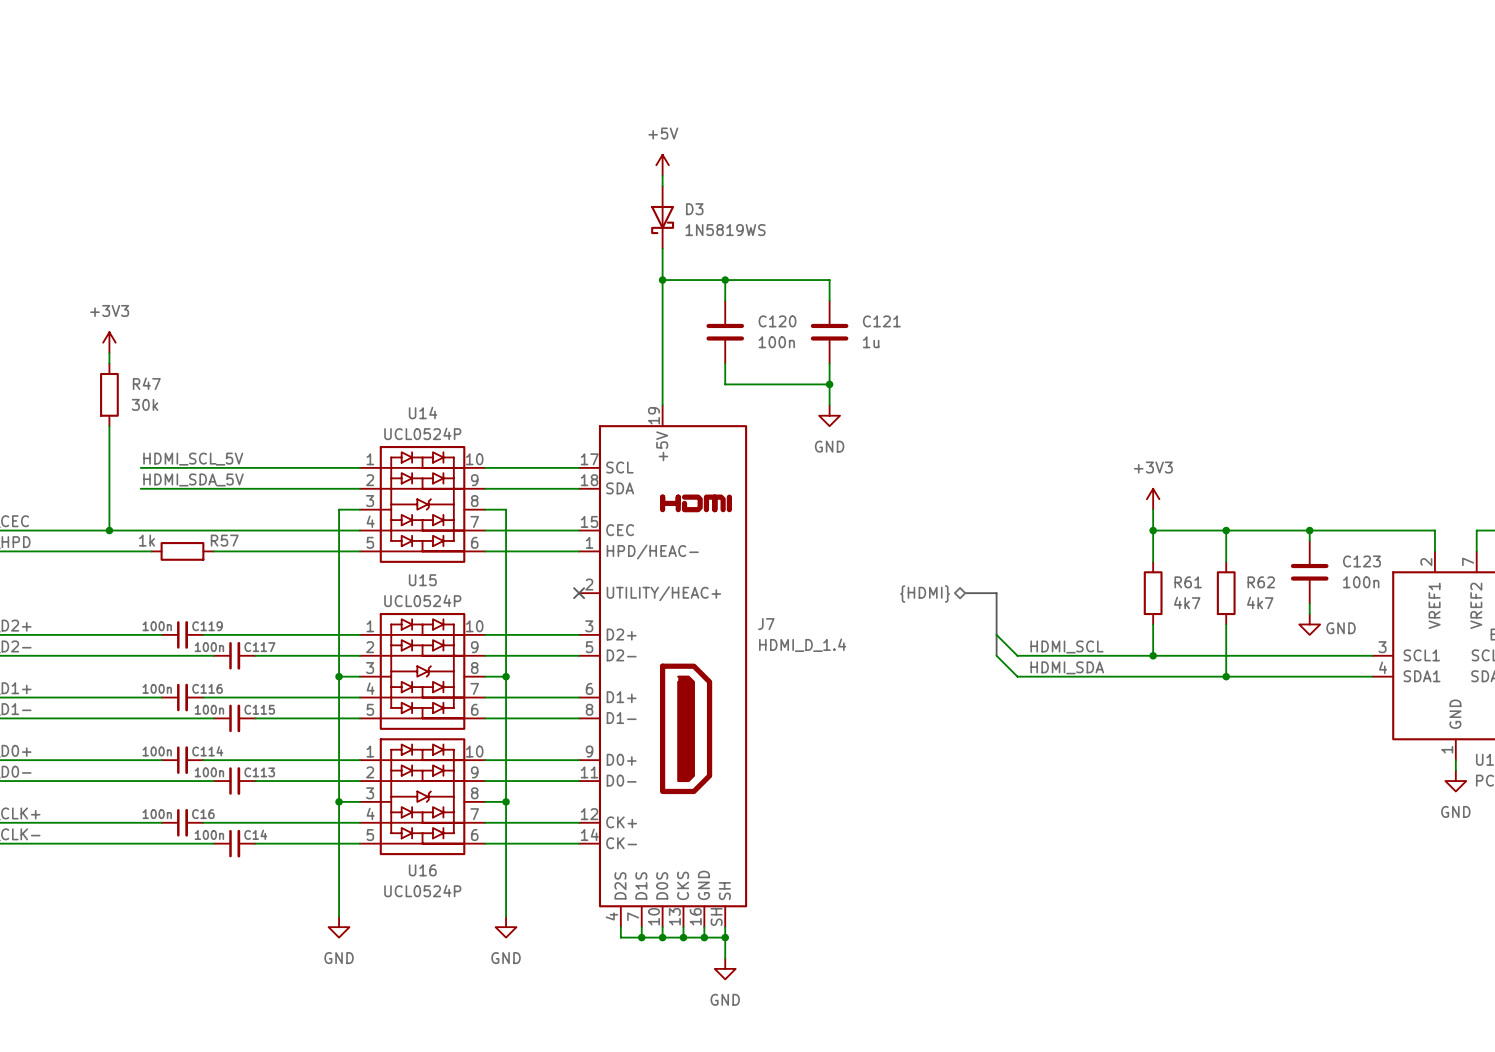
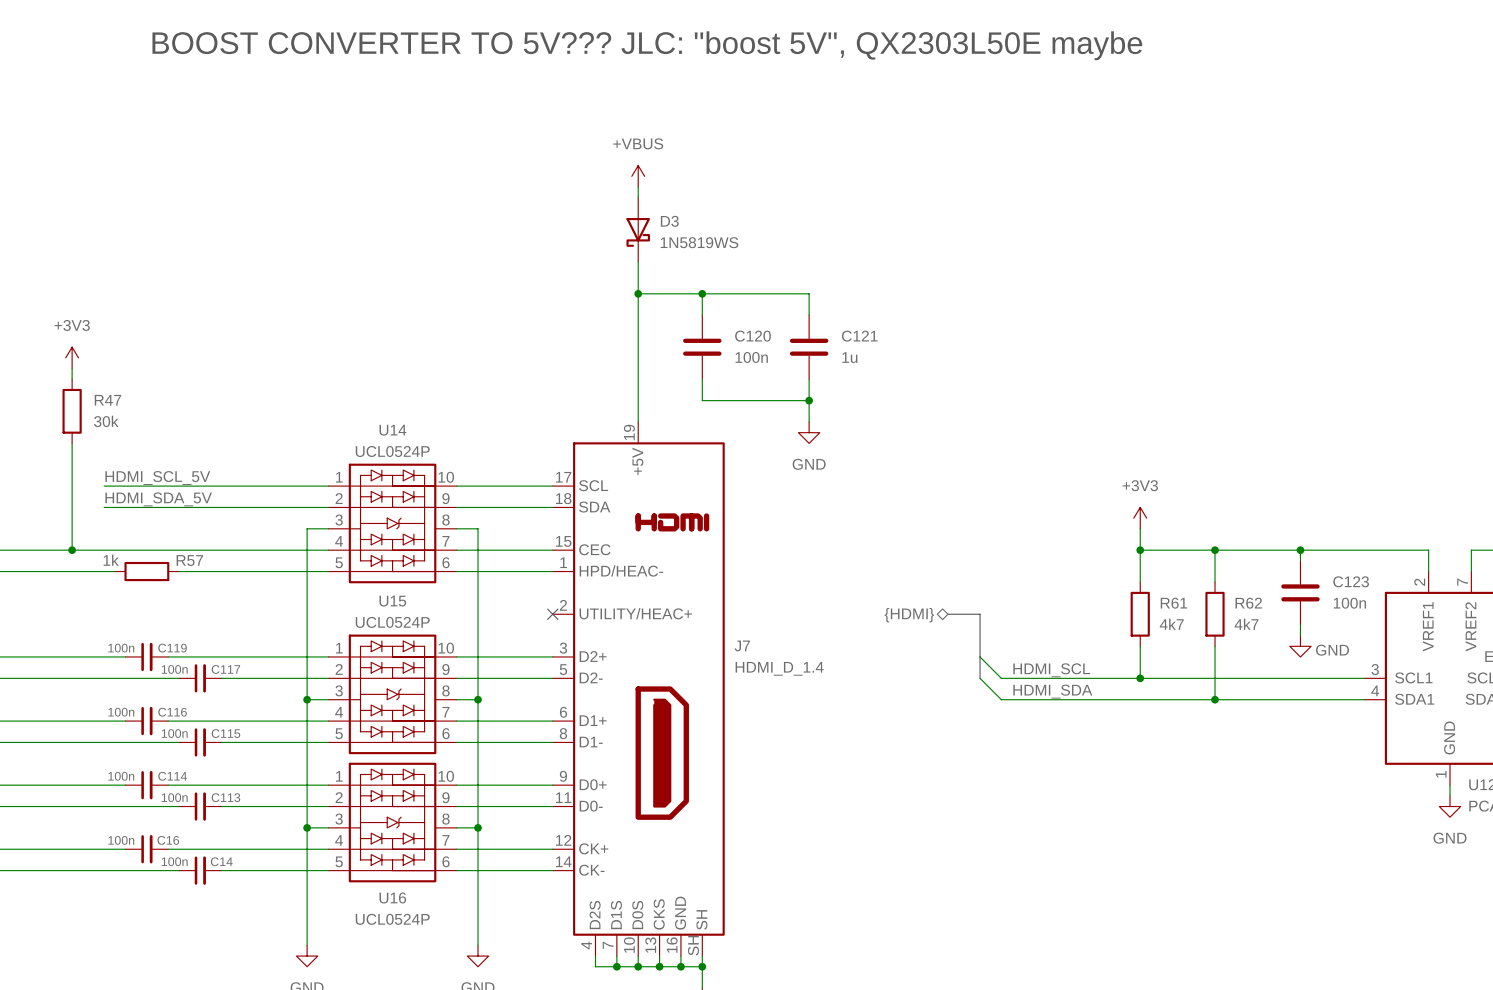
text: none -> BOOST CONVERTER TO 5V??? JLC: "boost 5V", QX2303L50E maybe (647, 45)
power symbol: +5V (662, 165) -> +VBUS (638, 176)

